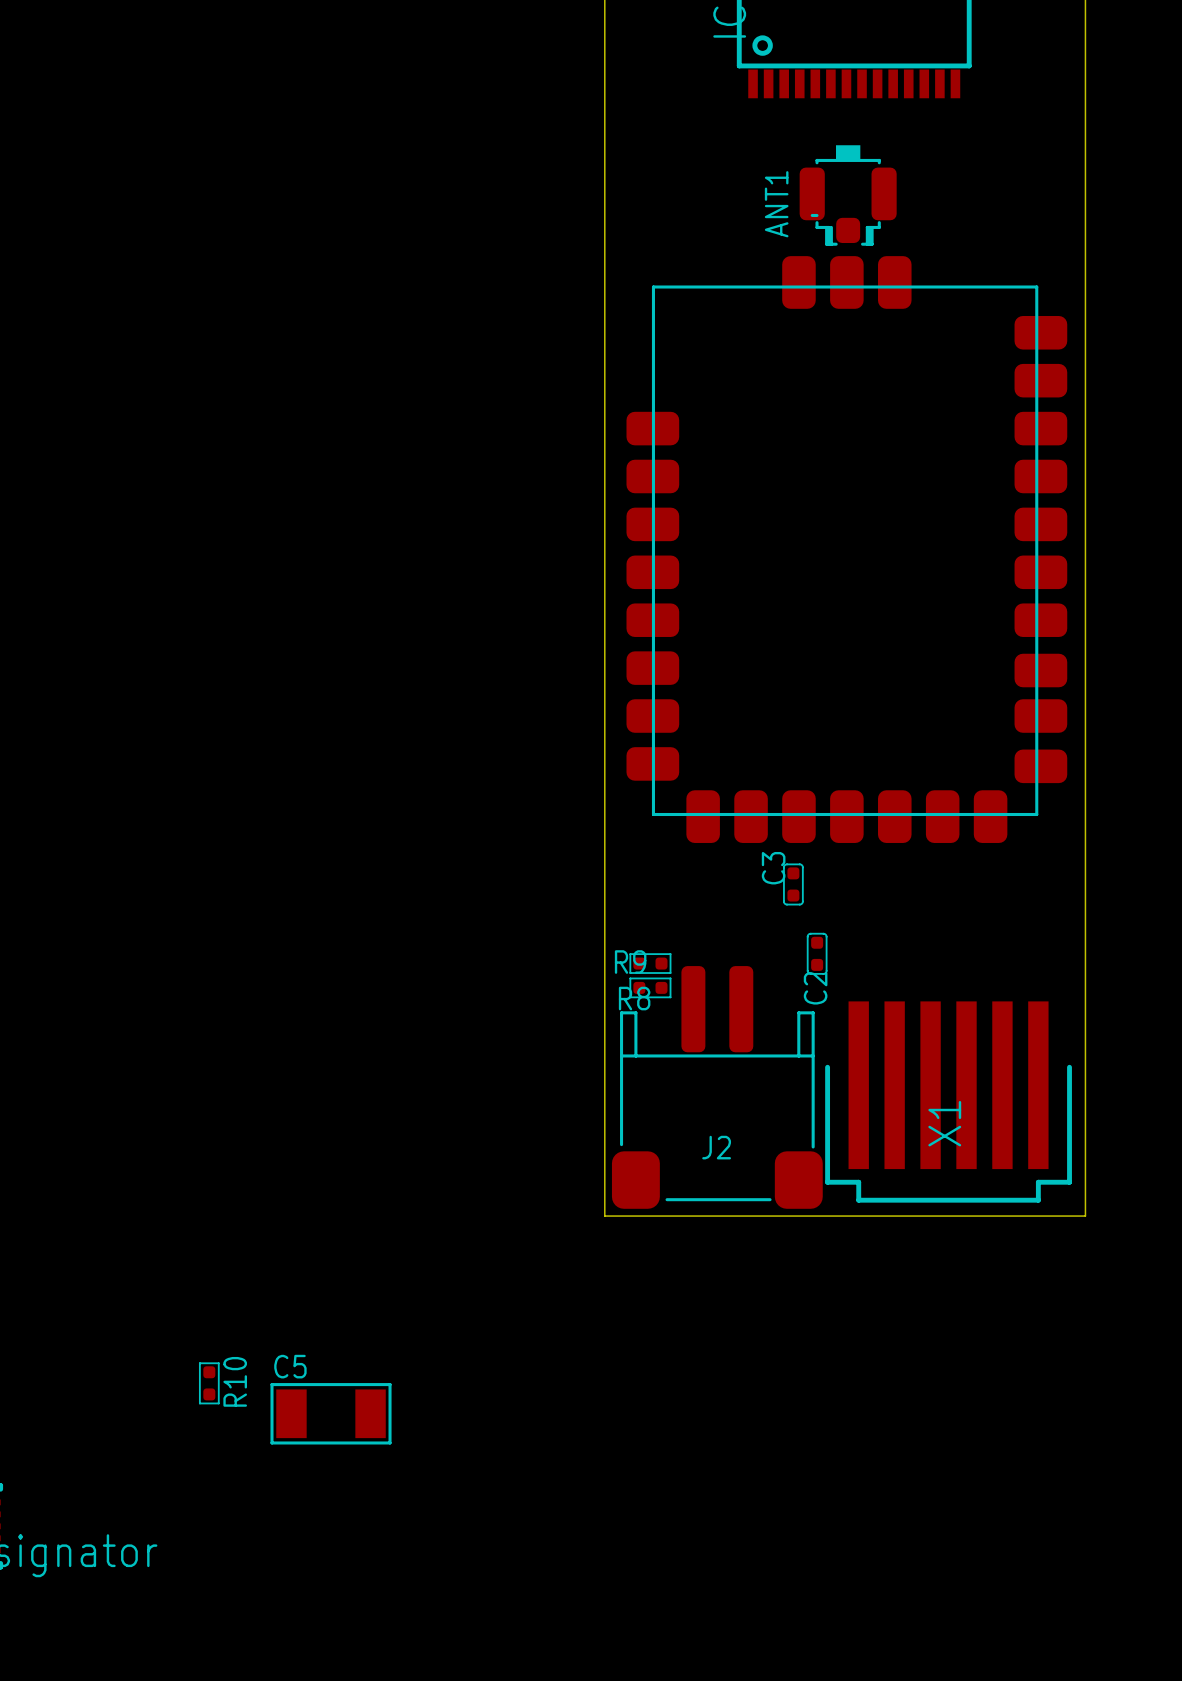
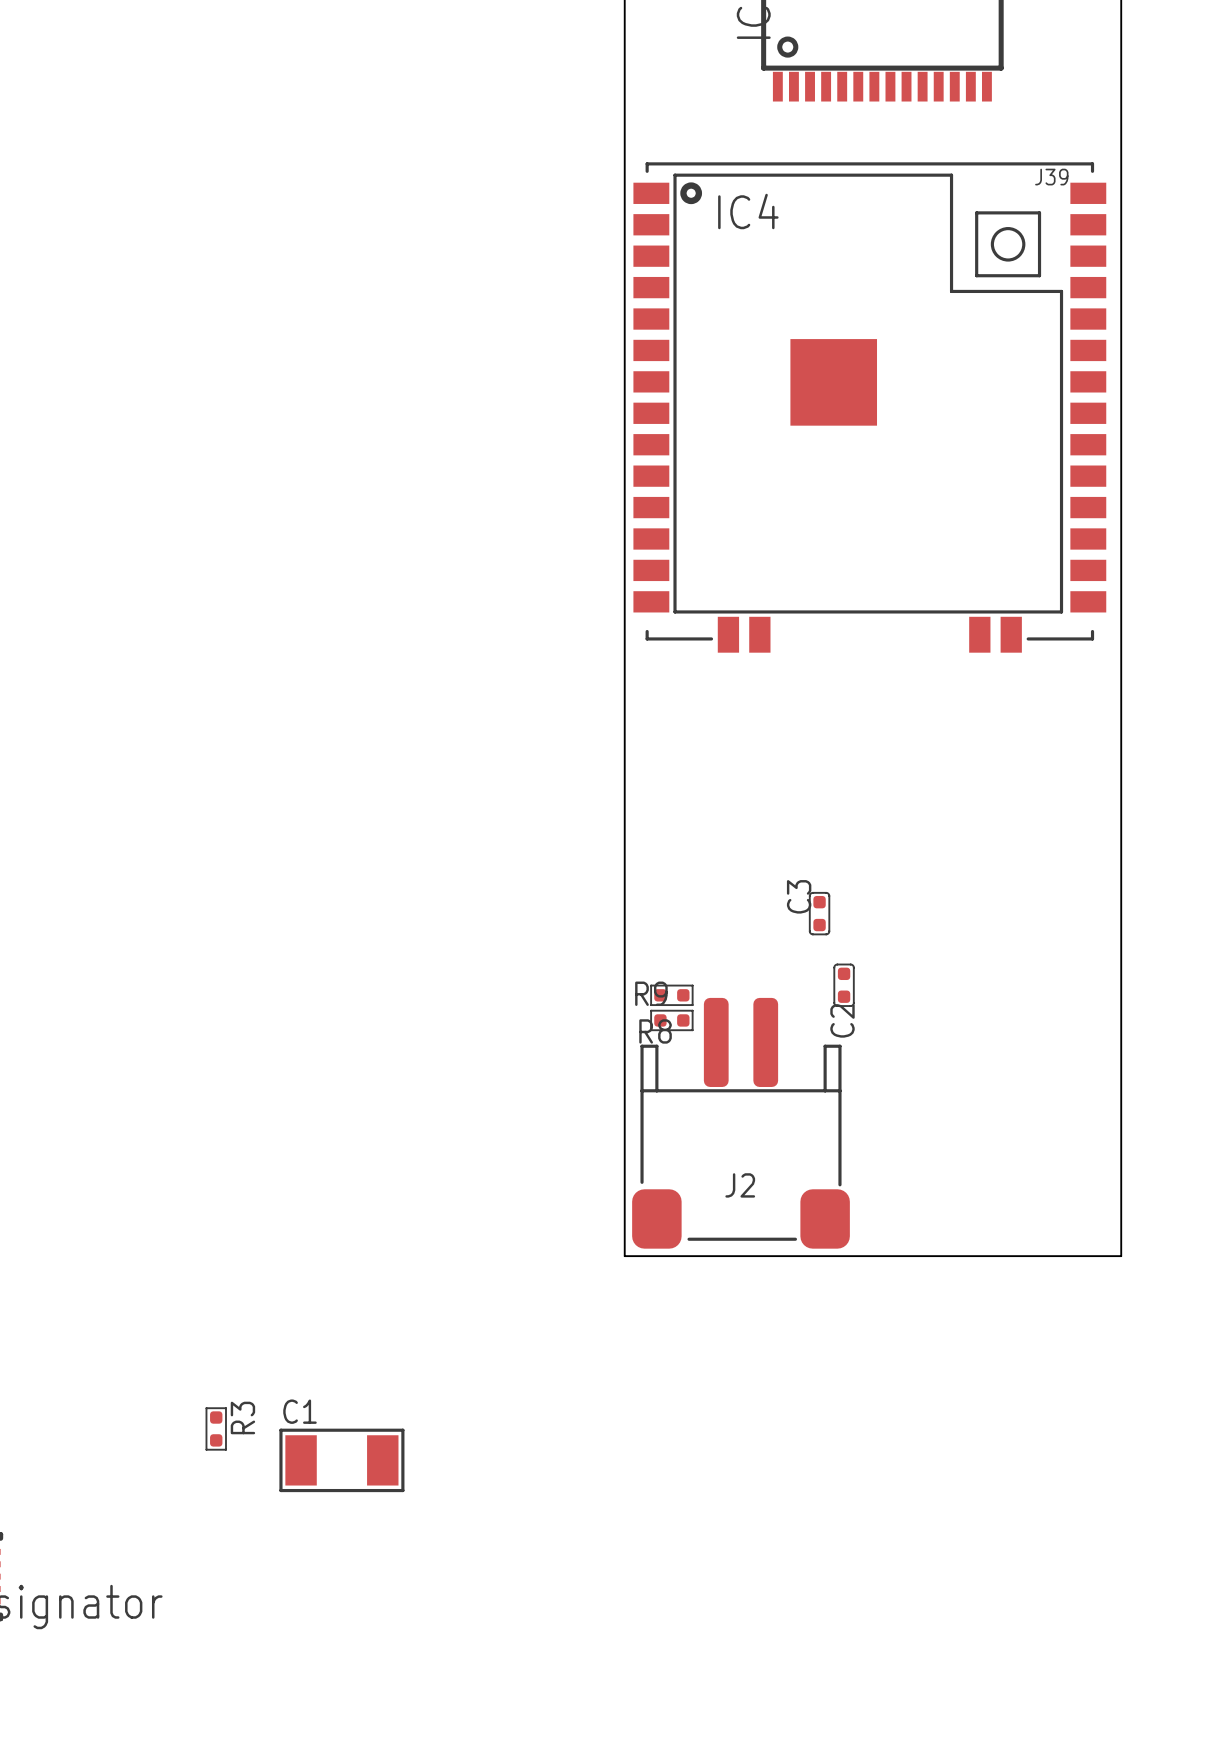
ANT1: (848, 195) -> none
IC4: none -> (869, 407)
part: (846, 549) -> none
X1: (948, 1102) -> none
C5 name: C5 (290, 1366) -> C1 (299, 1411)
R10 name: R10 (235, 1381) -> R3 (242, 1417)

